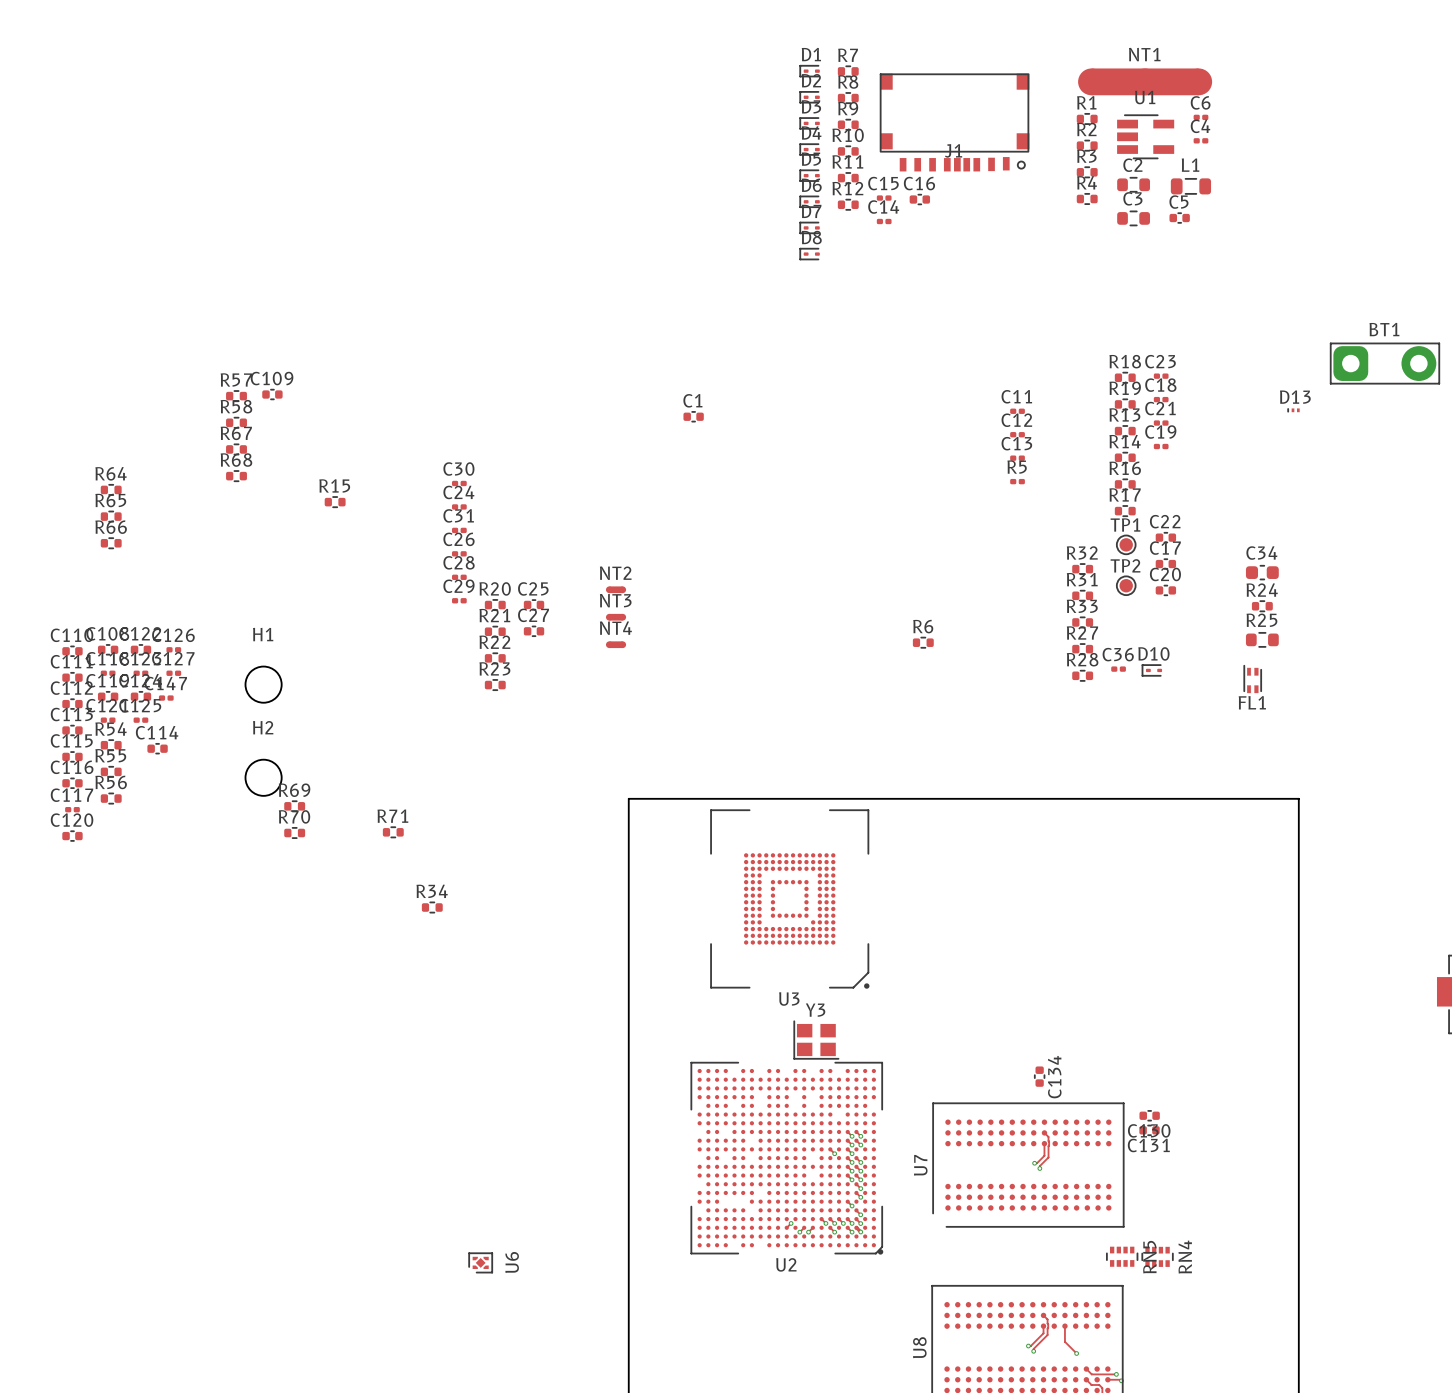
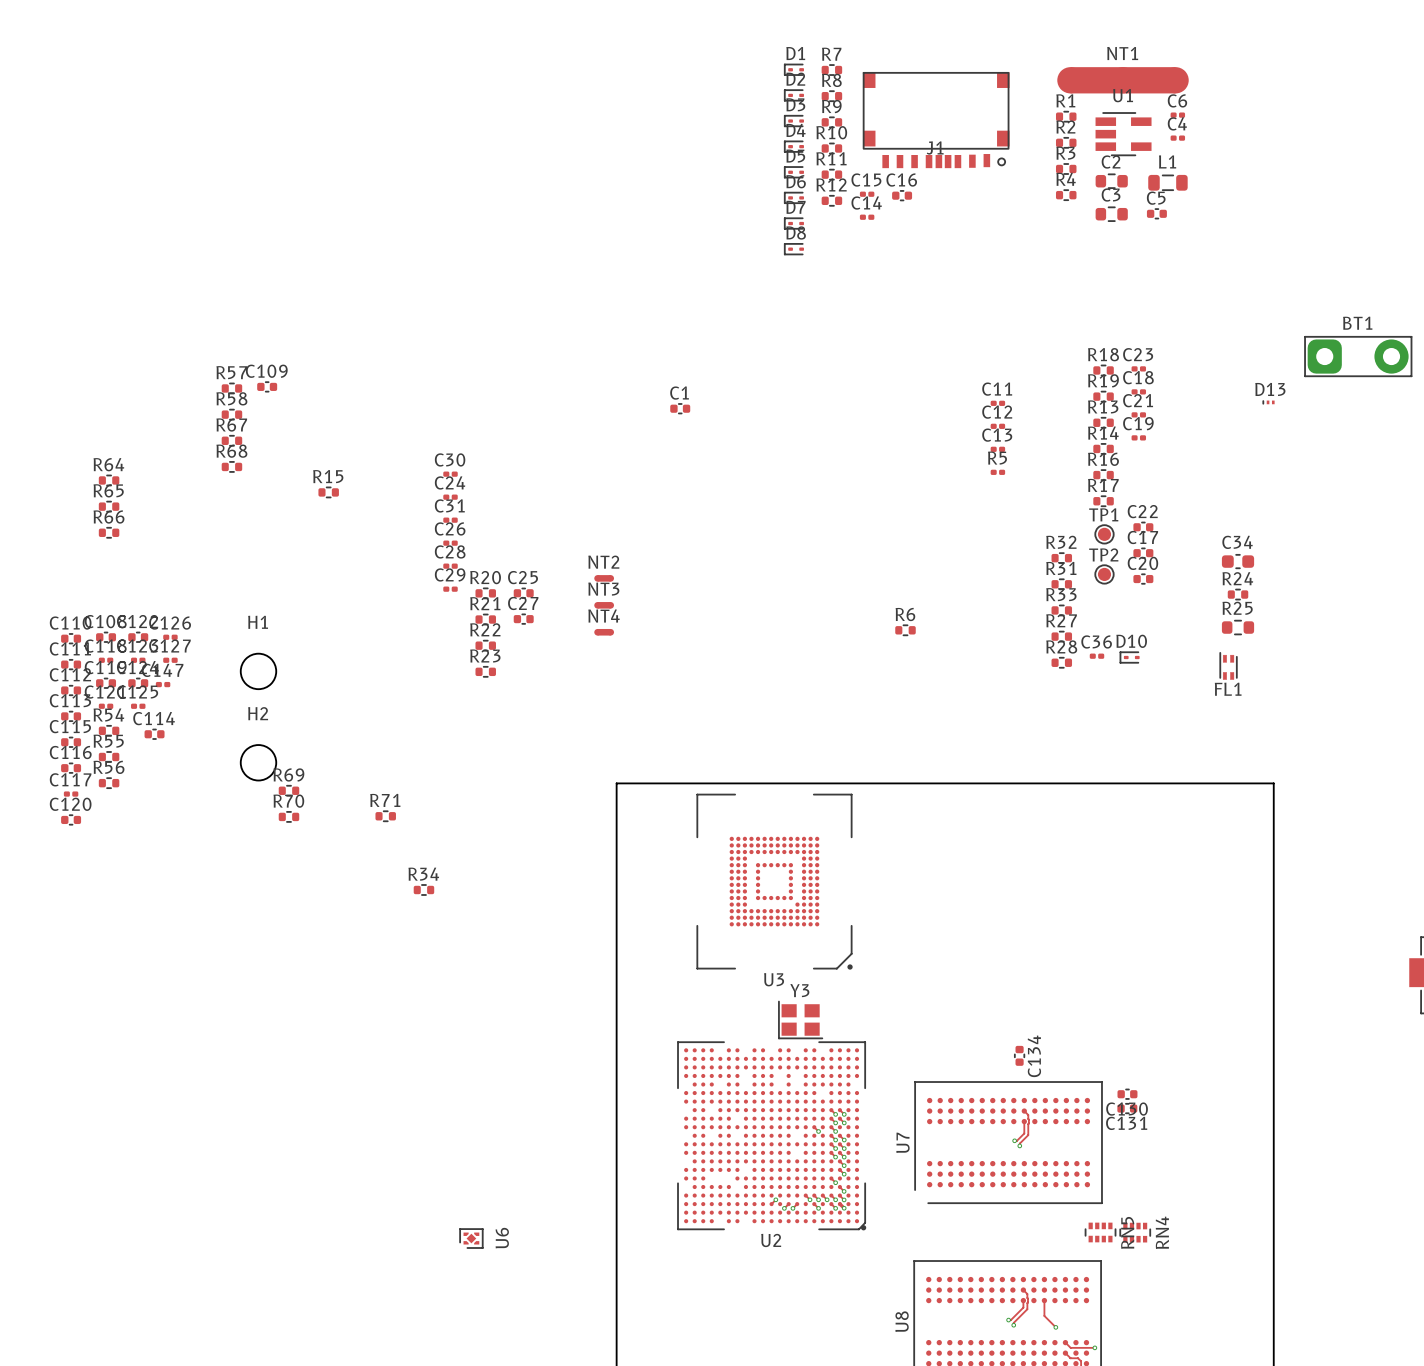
track: (1107, 1379) (1121, 1380) -> none
via: (1121, 1380) -> none

